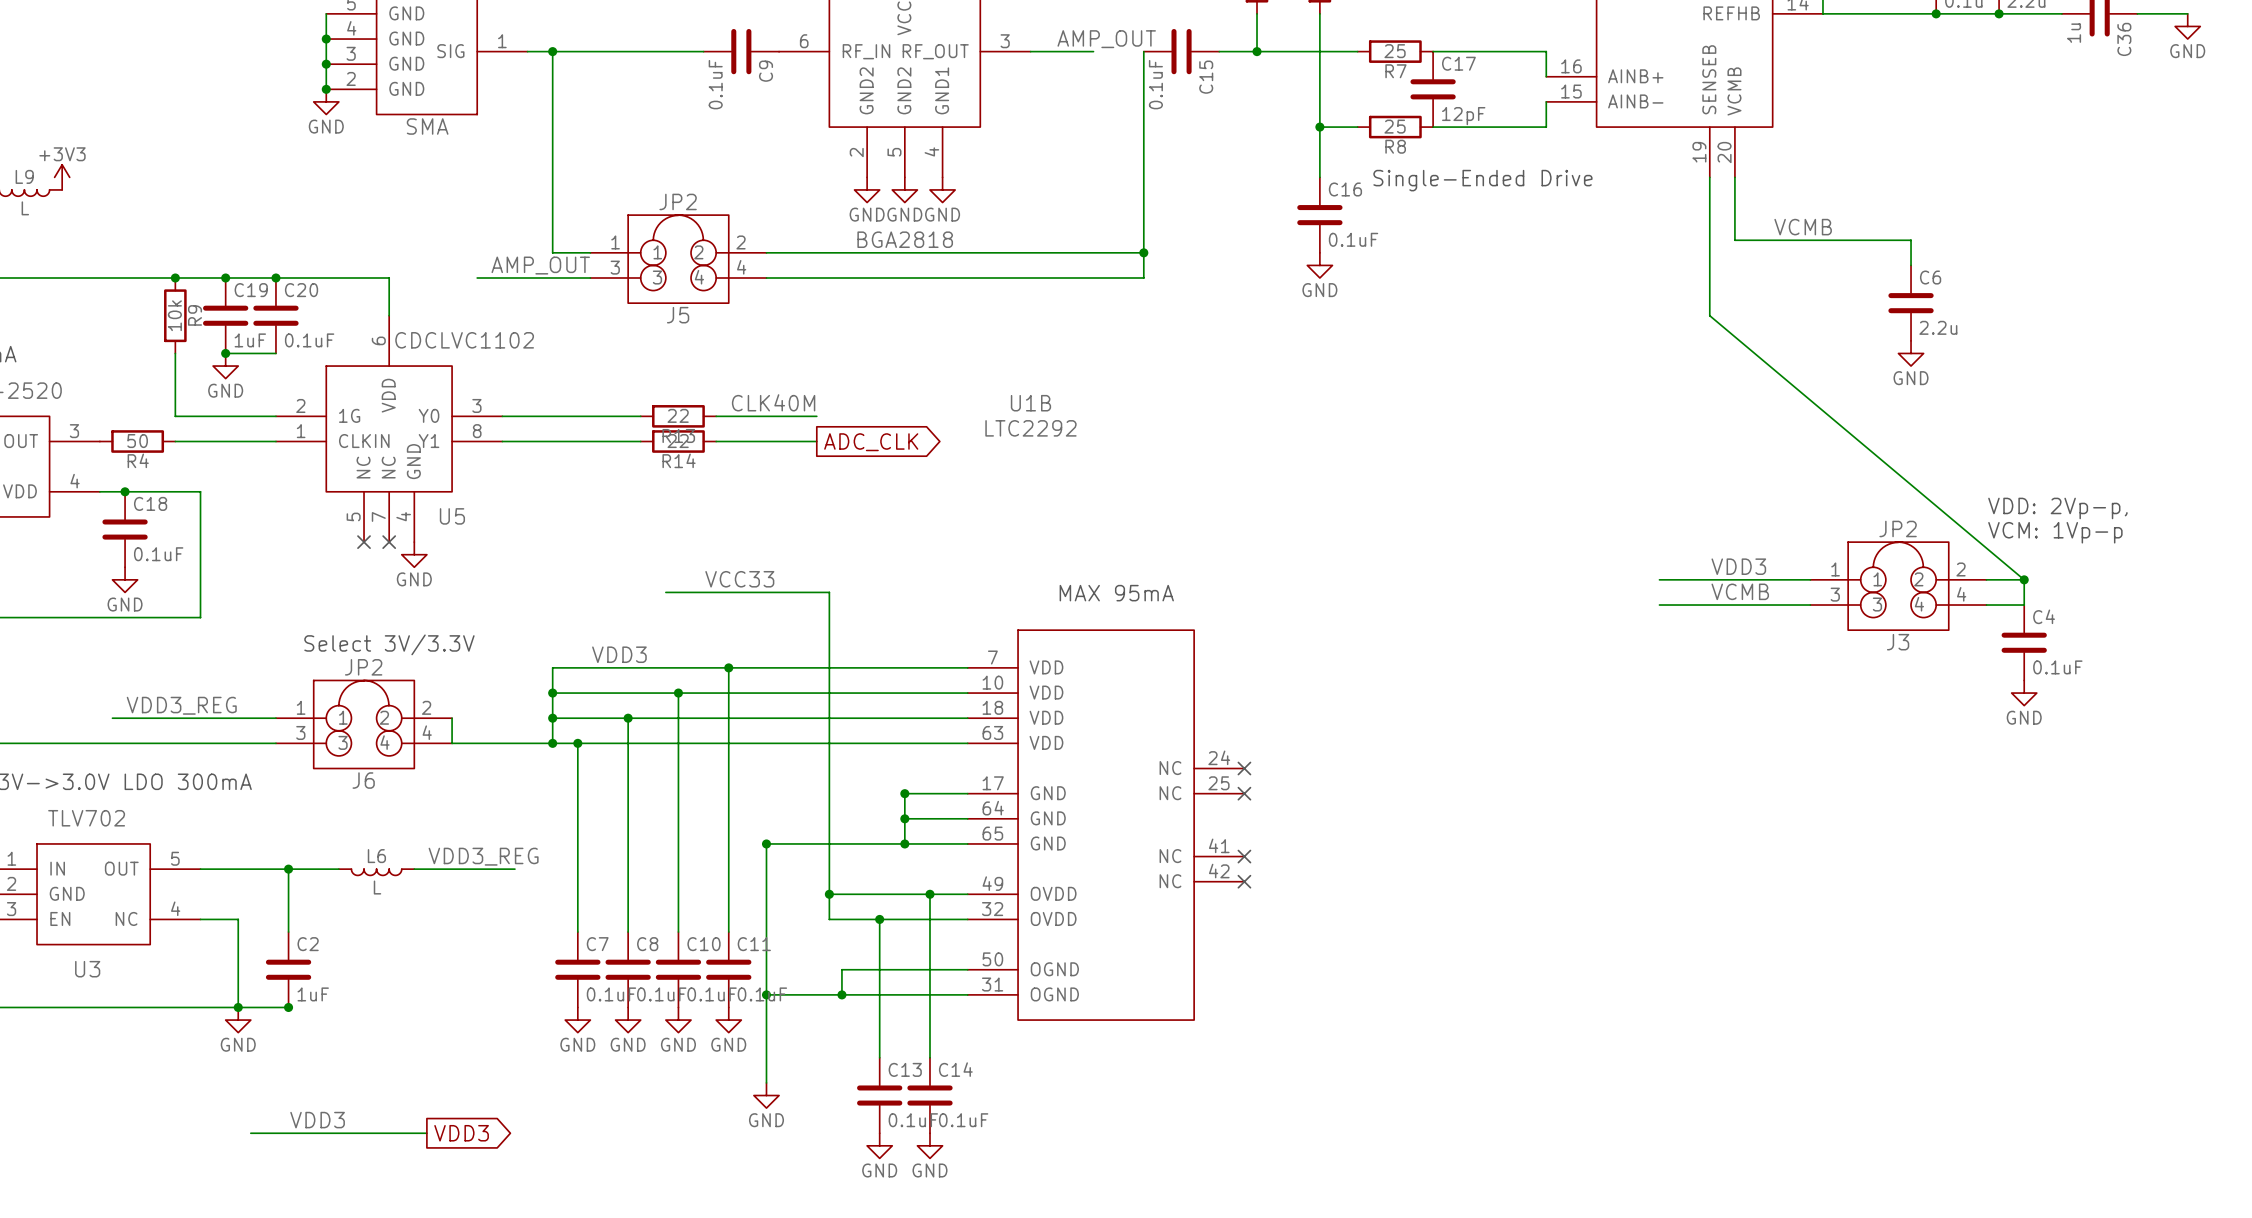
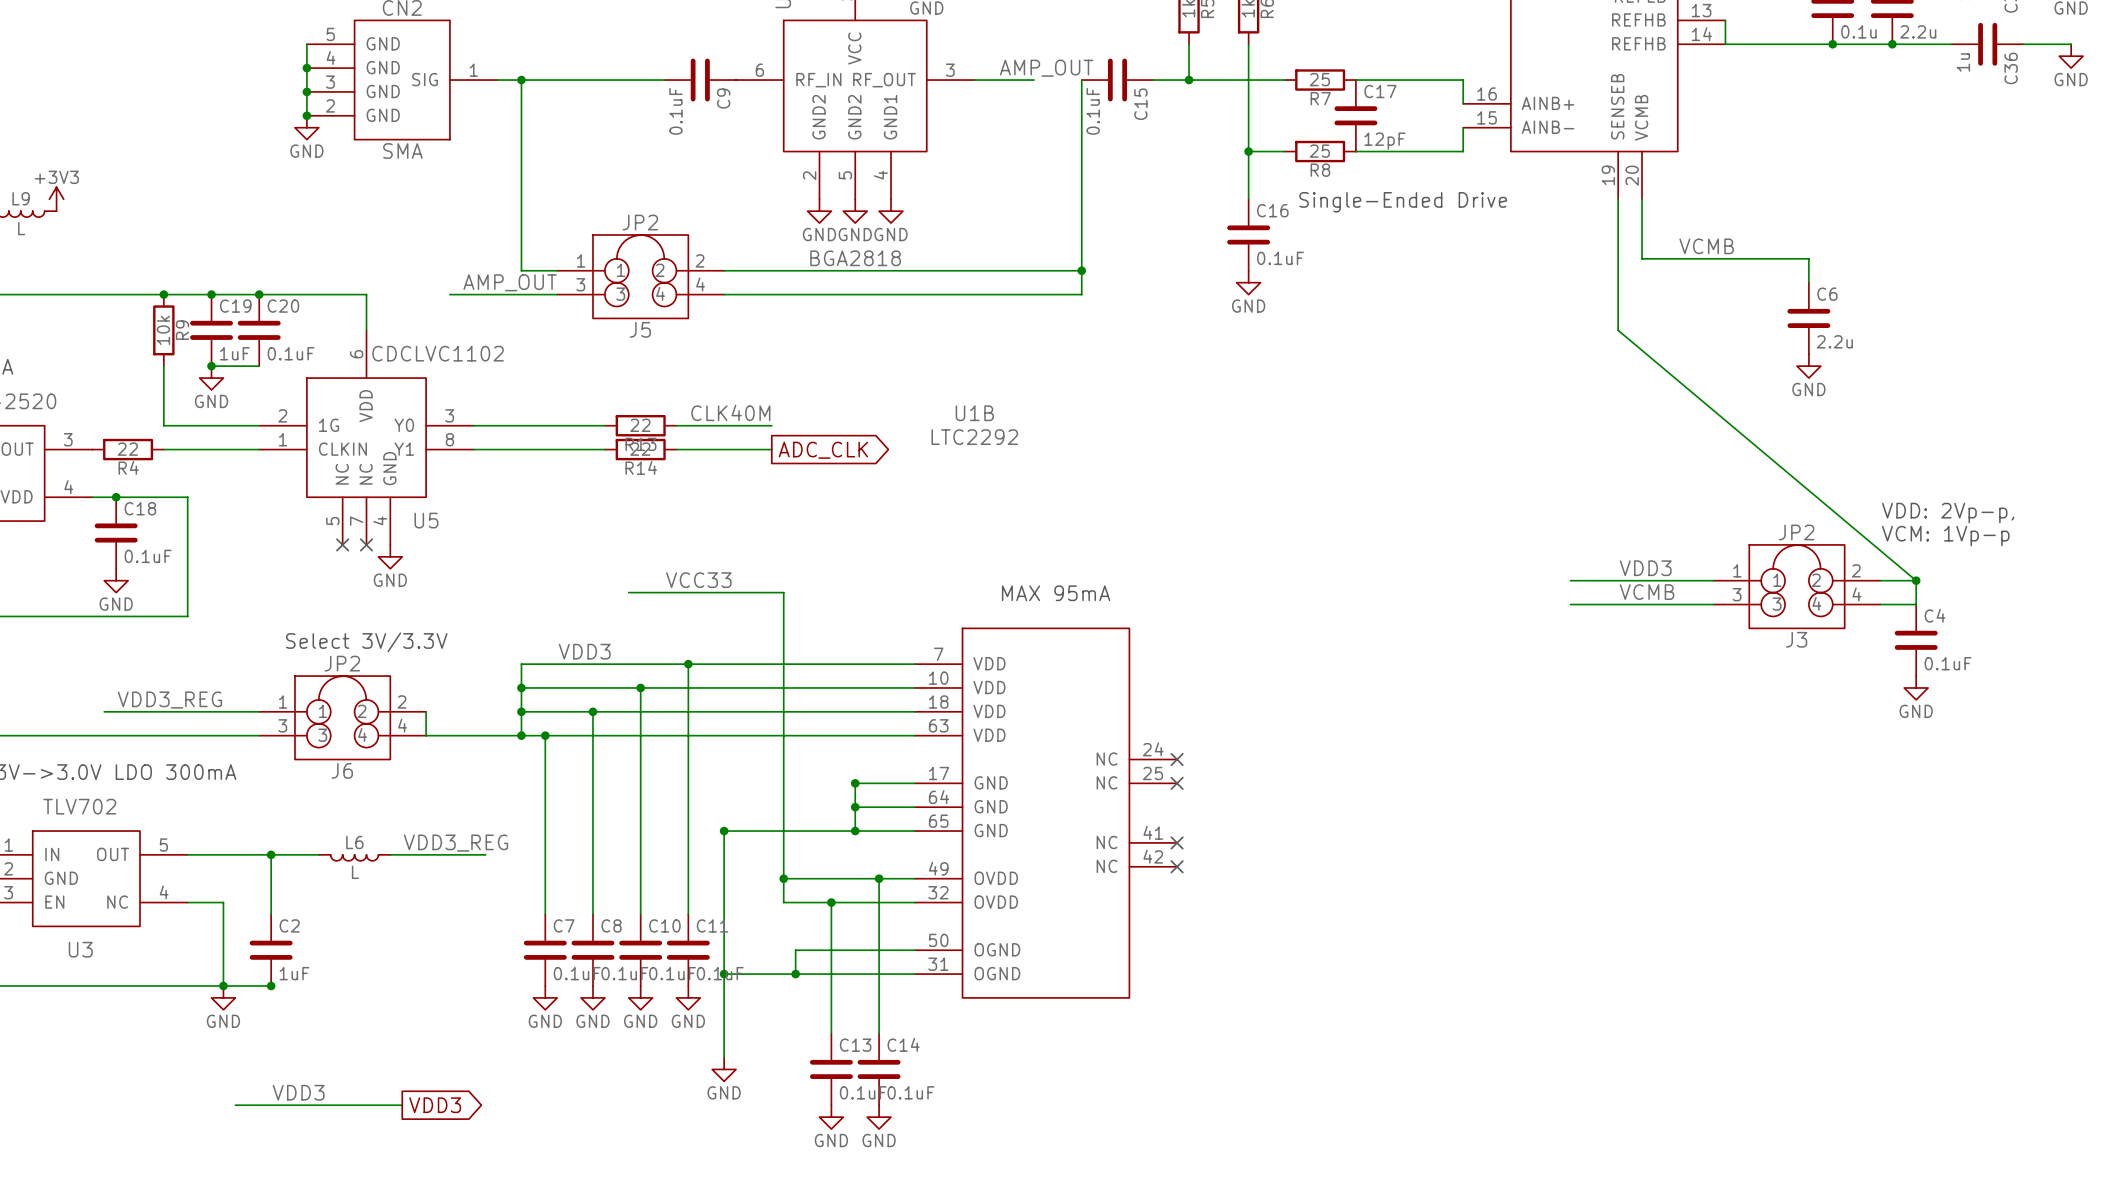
R4 value: 50 (137, 441) -> 22 (127, 449)

